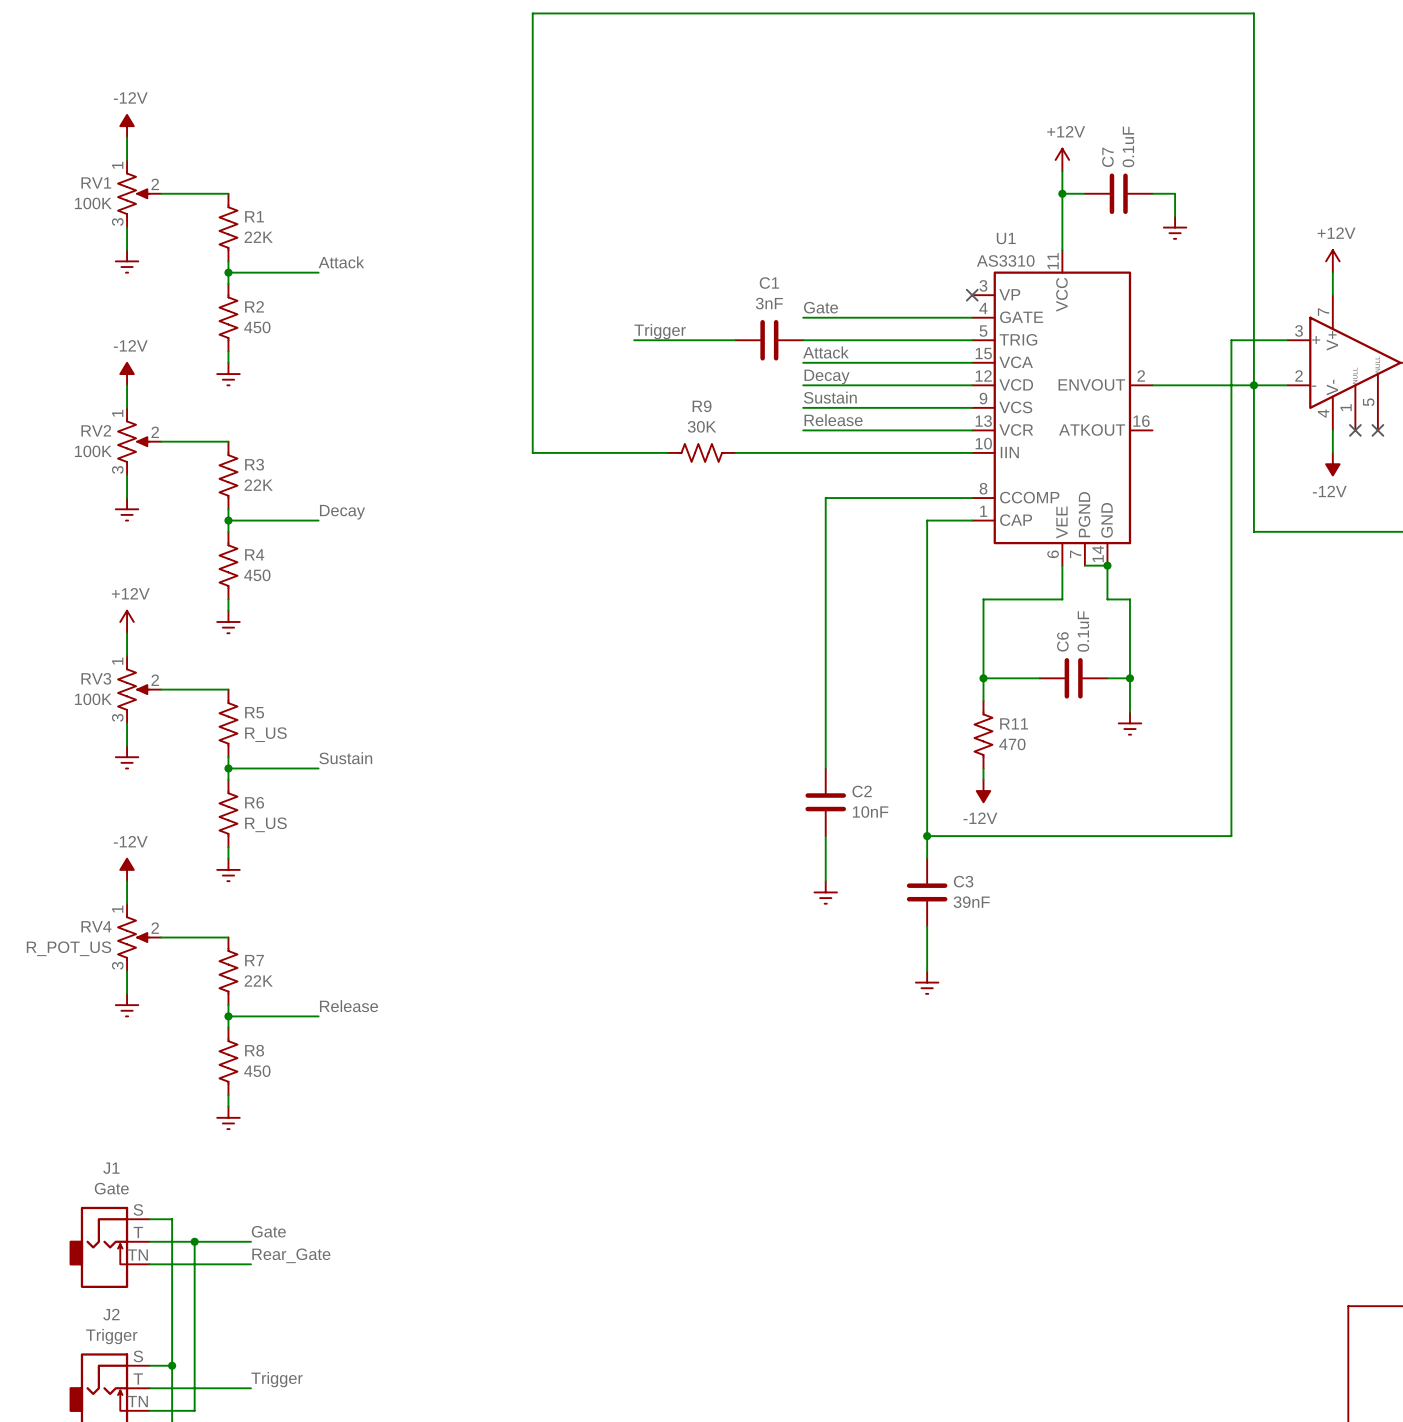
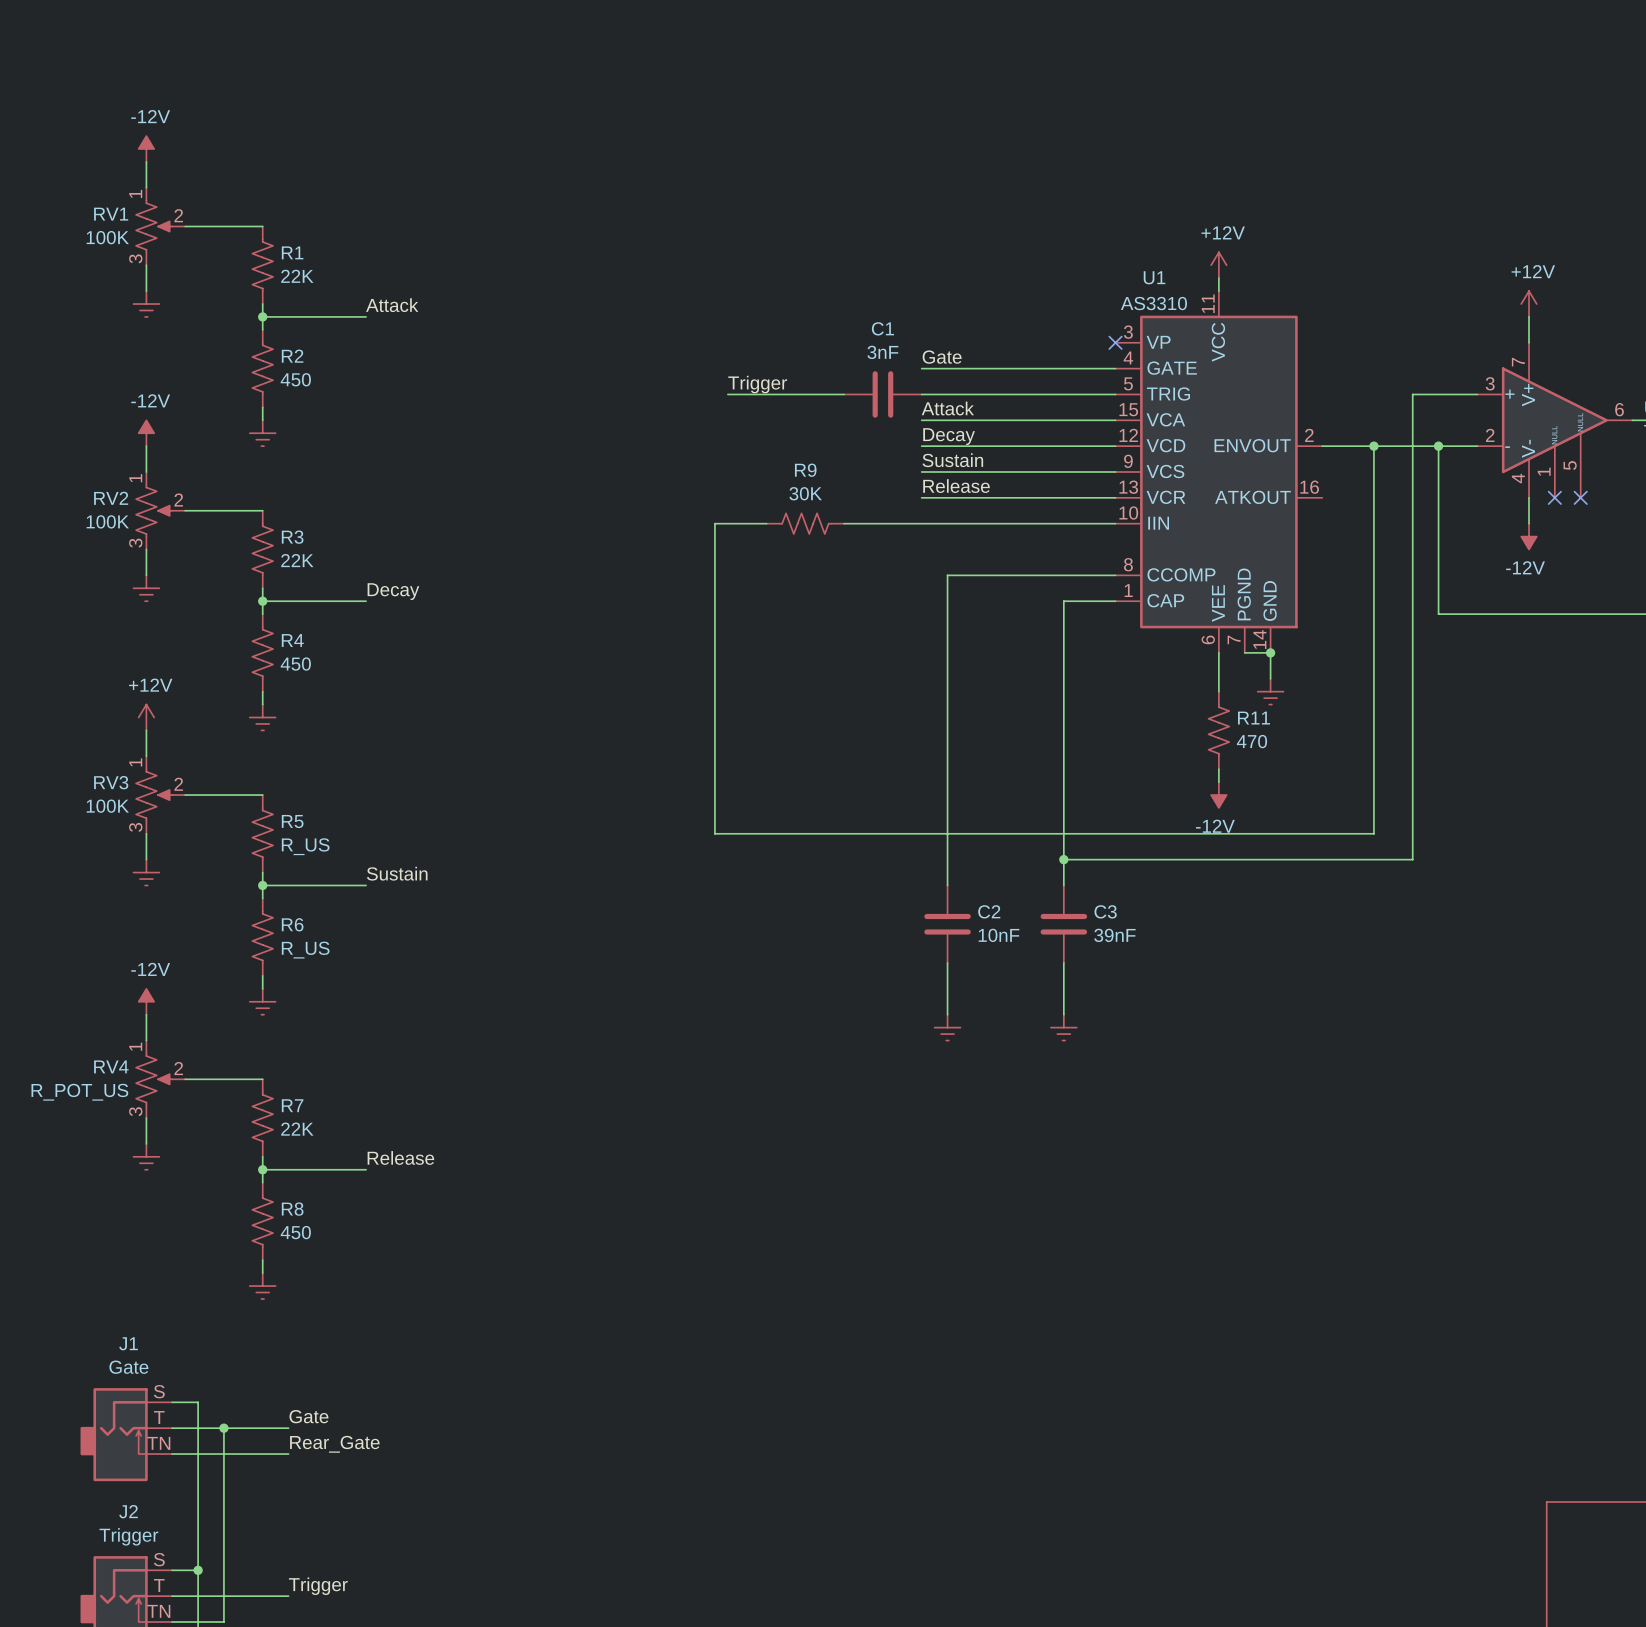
power symbol position: +12V (1062, 159) -> +12V (1218, 265)
wire: (1062, 171) (1062, 238) -> none
wire: (1062, 193) (1084, 193) -> none
junction: (1062, 193) -> none
C7: 0.1uF (1118, 193) -> none
wire: (1152, 193) (1175, 193) (1175, 216) -> none
power symbol: (1175, 227) -> none
junction: none -> (1373, 446)
wire: (1253, 385) (1253, 13) (532, 13) (532, 452) (622, 452) -> (1373, 446) (1373, 833) (714, 833) (714, 523)
wire: (1107, 588) (1107, 599) (1129, 599) (1129, 712) -> none
wire: (1062, 599) (983, 599) (983, 700) -> none
wire: (983, 678) (1039, 678) -> none
junction: (983, 678) -> none
C6: 0.1uF (1073, 678) -> none
wire: (1107, 678) (1129, 678) -> none
junction: (1129, 678) -> none
power symbol position: (1129, 723) -> (1270, 691)
R11 position: (983, 734) -> (1218, 730)
junction: none -> (1063, 859)
wire: (1231, 745) (1231, 836) (927, 836) (927, 768) -> (1412, 859) (1063, 859)
wire: (983, 768) (983, 779) -> (1218, 769) (1218, 782)
power symbol position: -12V (983, 791) -> -12V (1218, 795)
junction: (927, 836) -> none
C3 position: (927, 892) -> (1063, 924)
wire: (927, 926) (927, 971) -> none
power symbol position: (927, 982) -> (1063, 1027)

